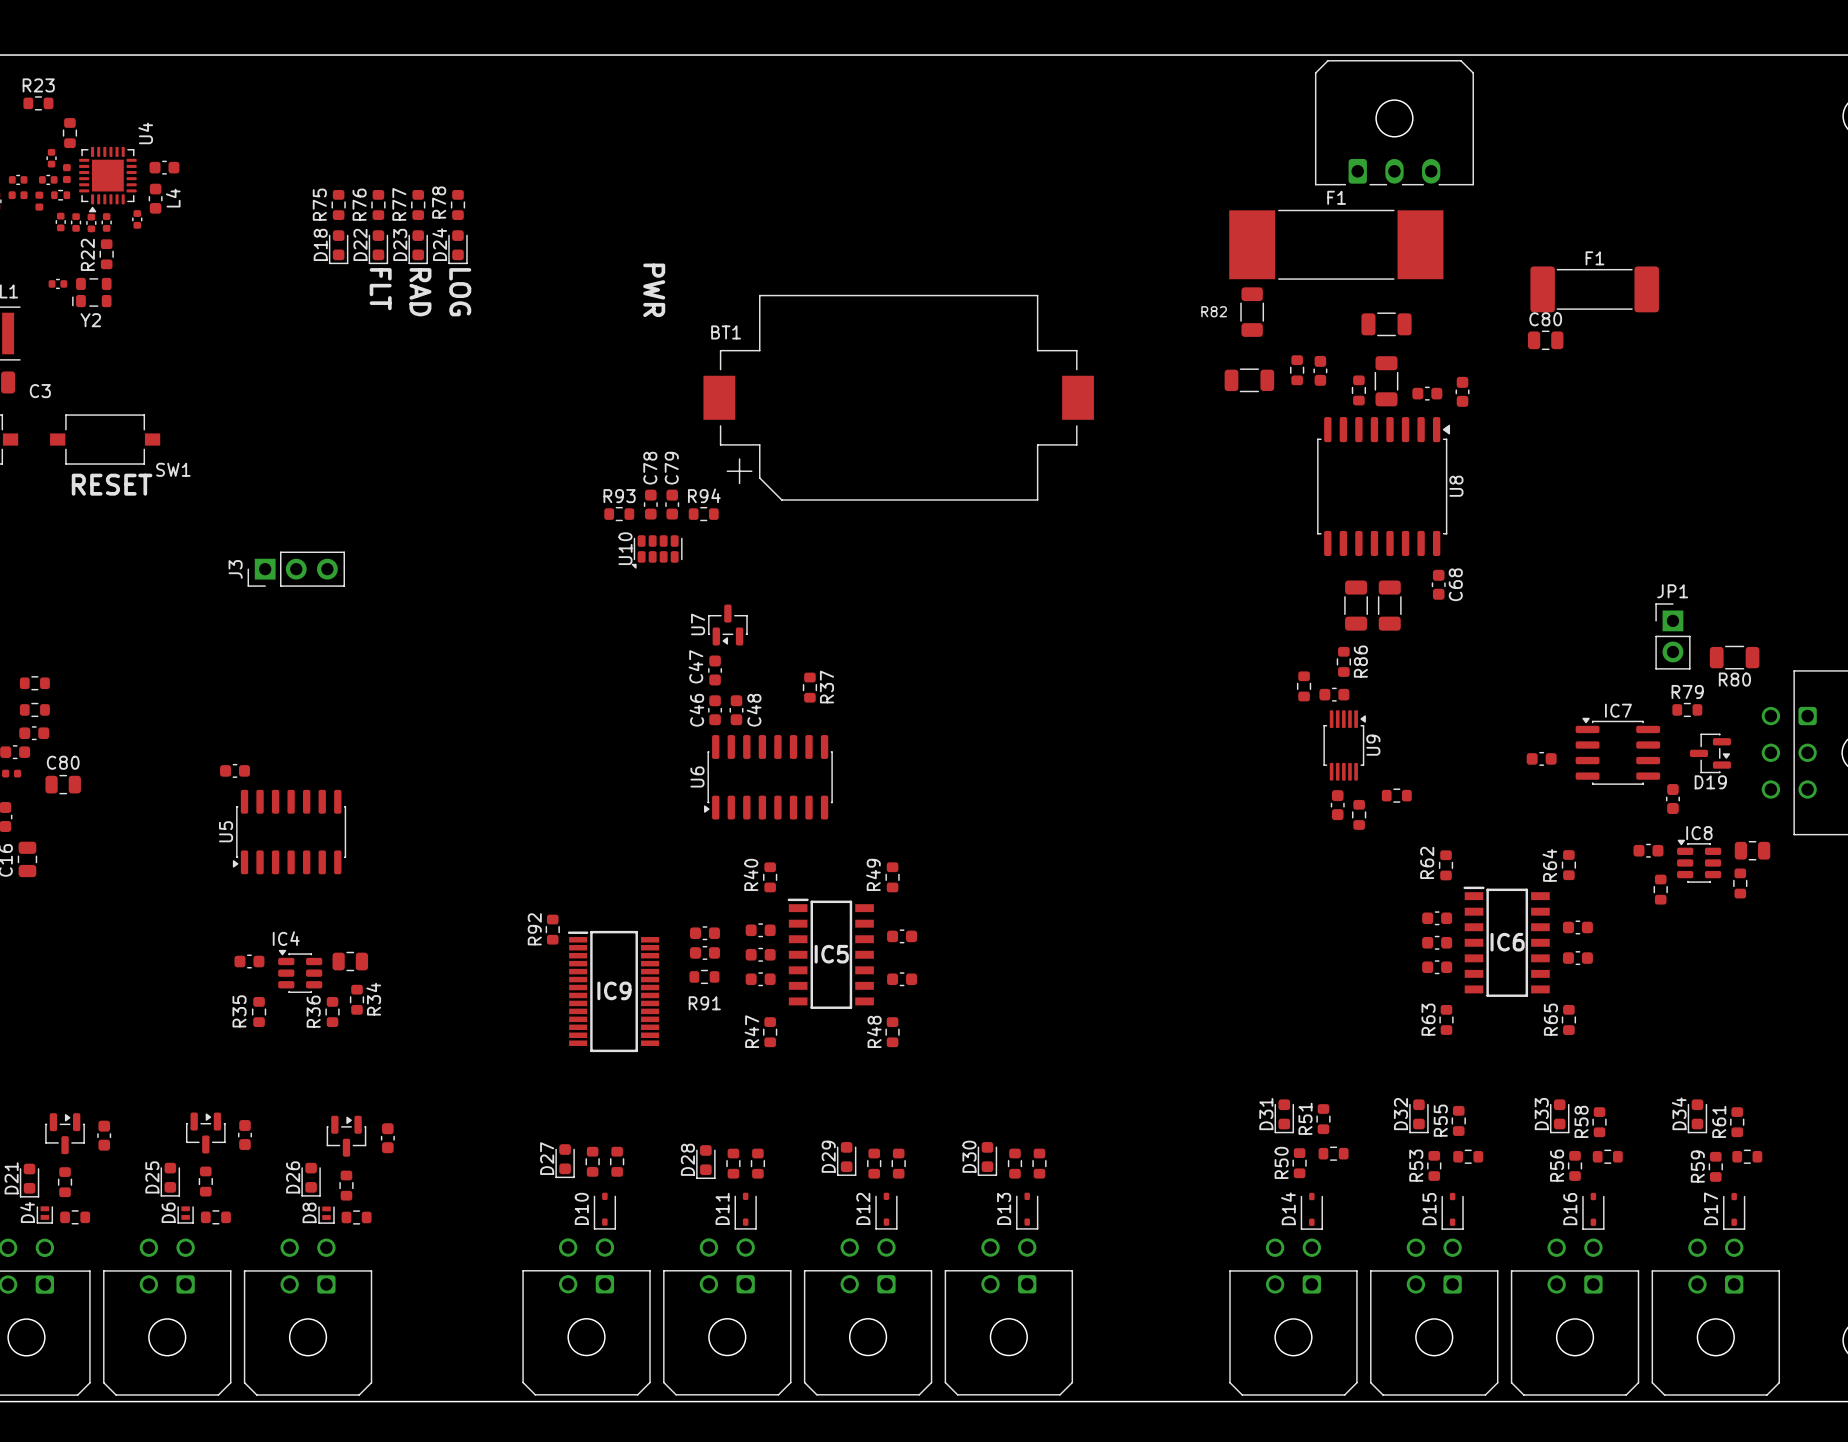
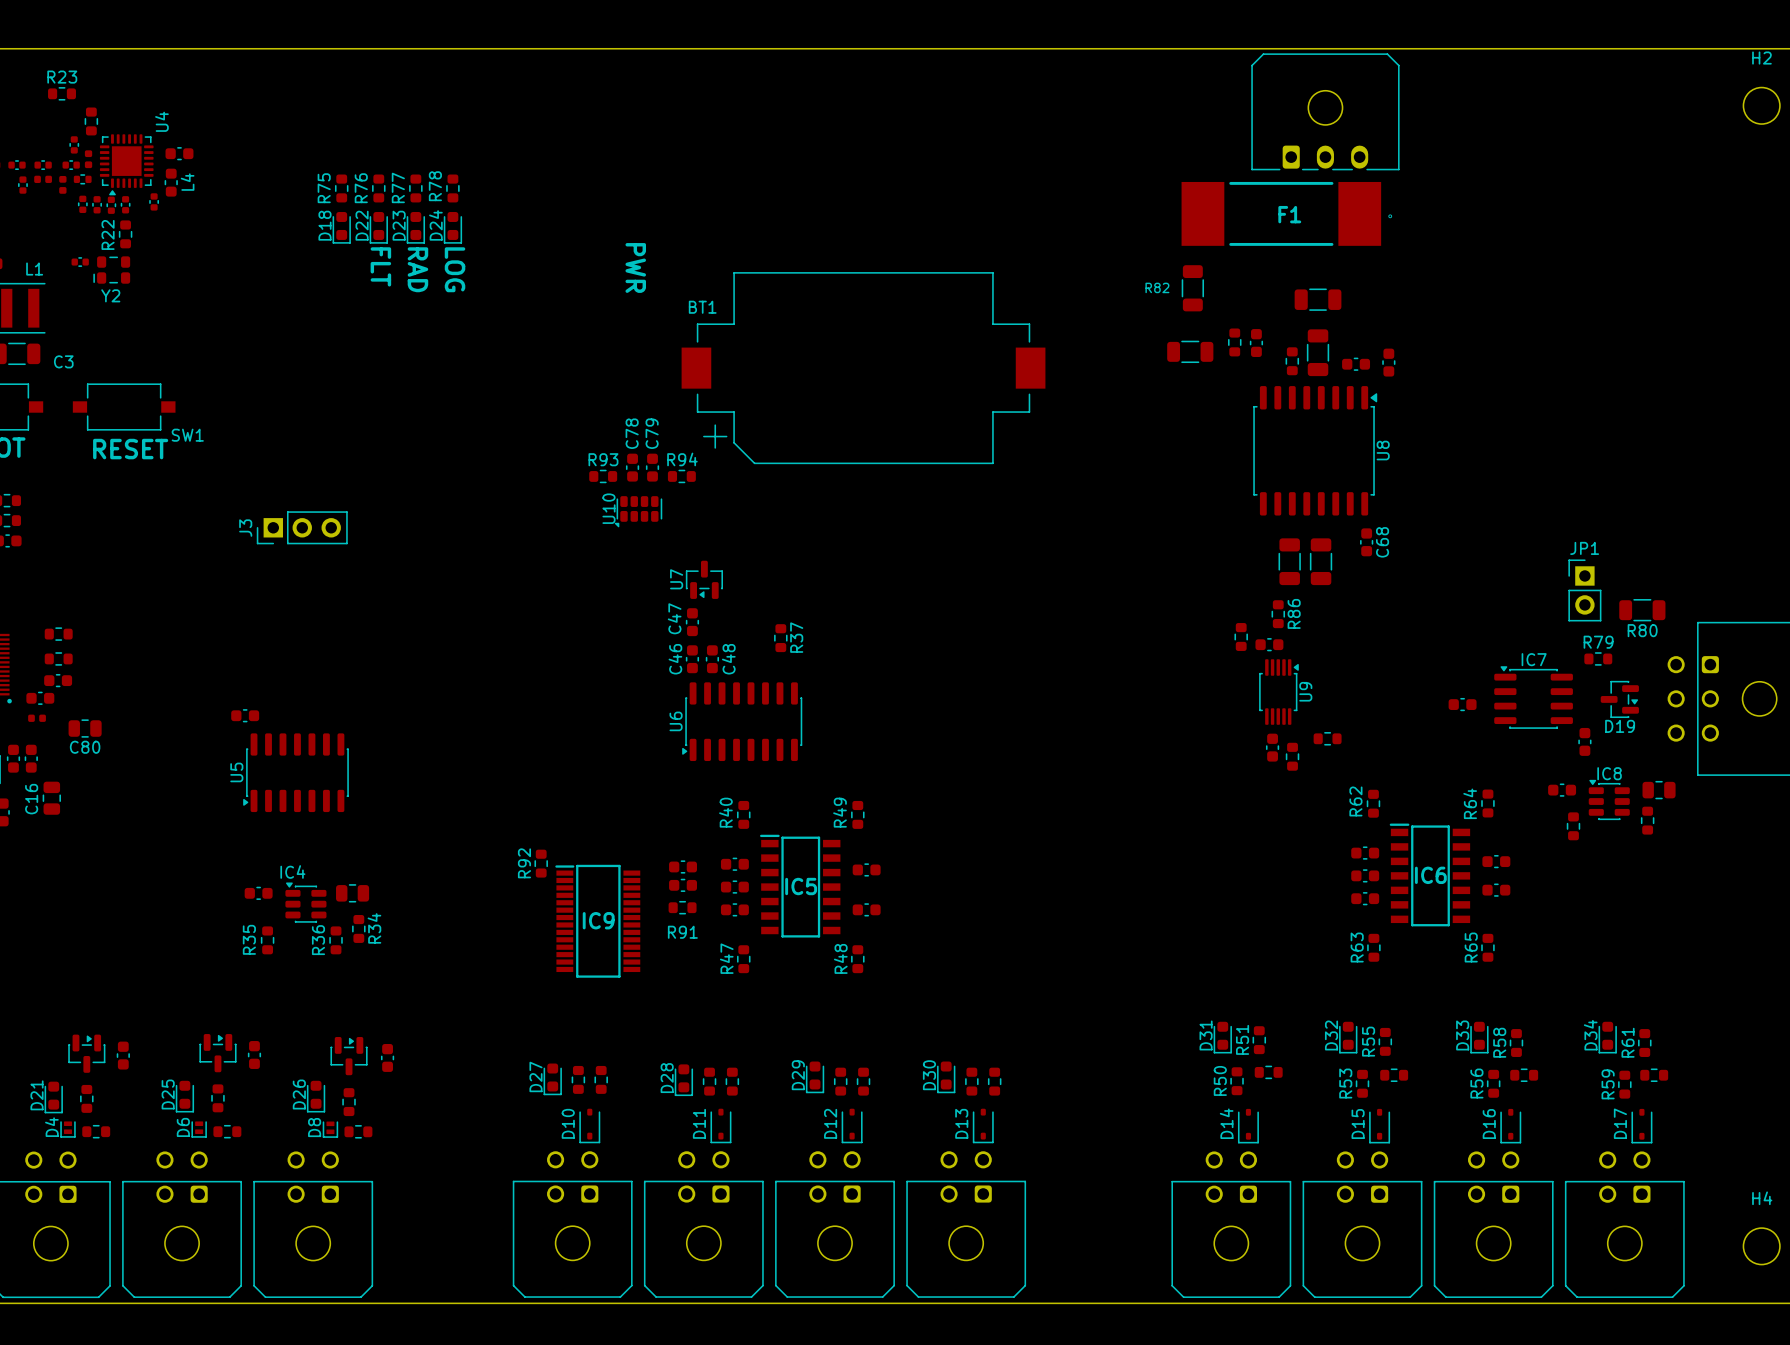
F1: none -> (1286, 213)
F1: (1336, 244) -> none
F1: (1594, 289) -> none
C80: (1545, 340) -> none
C80 name position: C80 (63, 762) -> C80 (85, 747)

